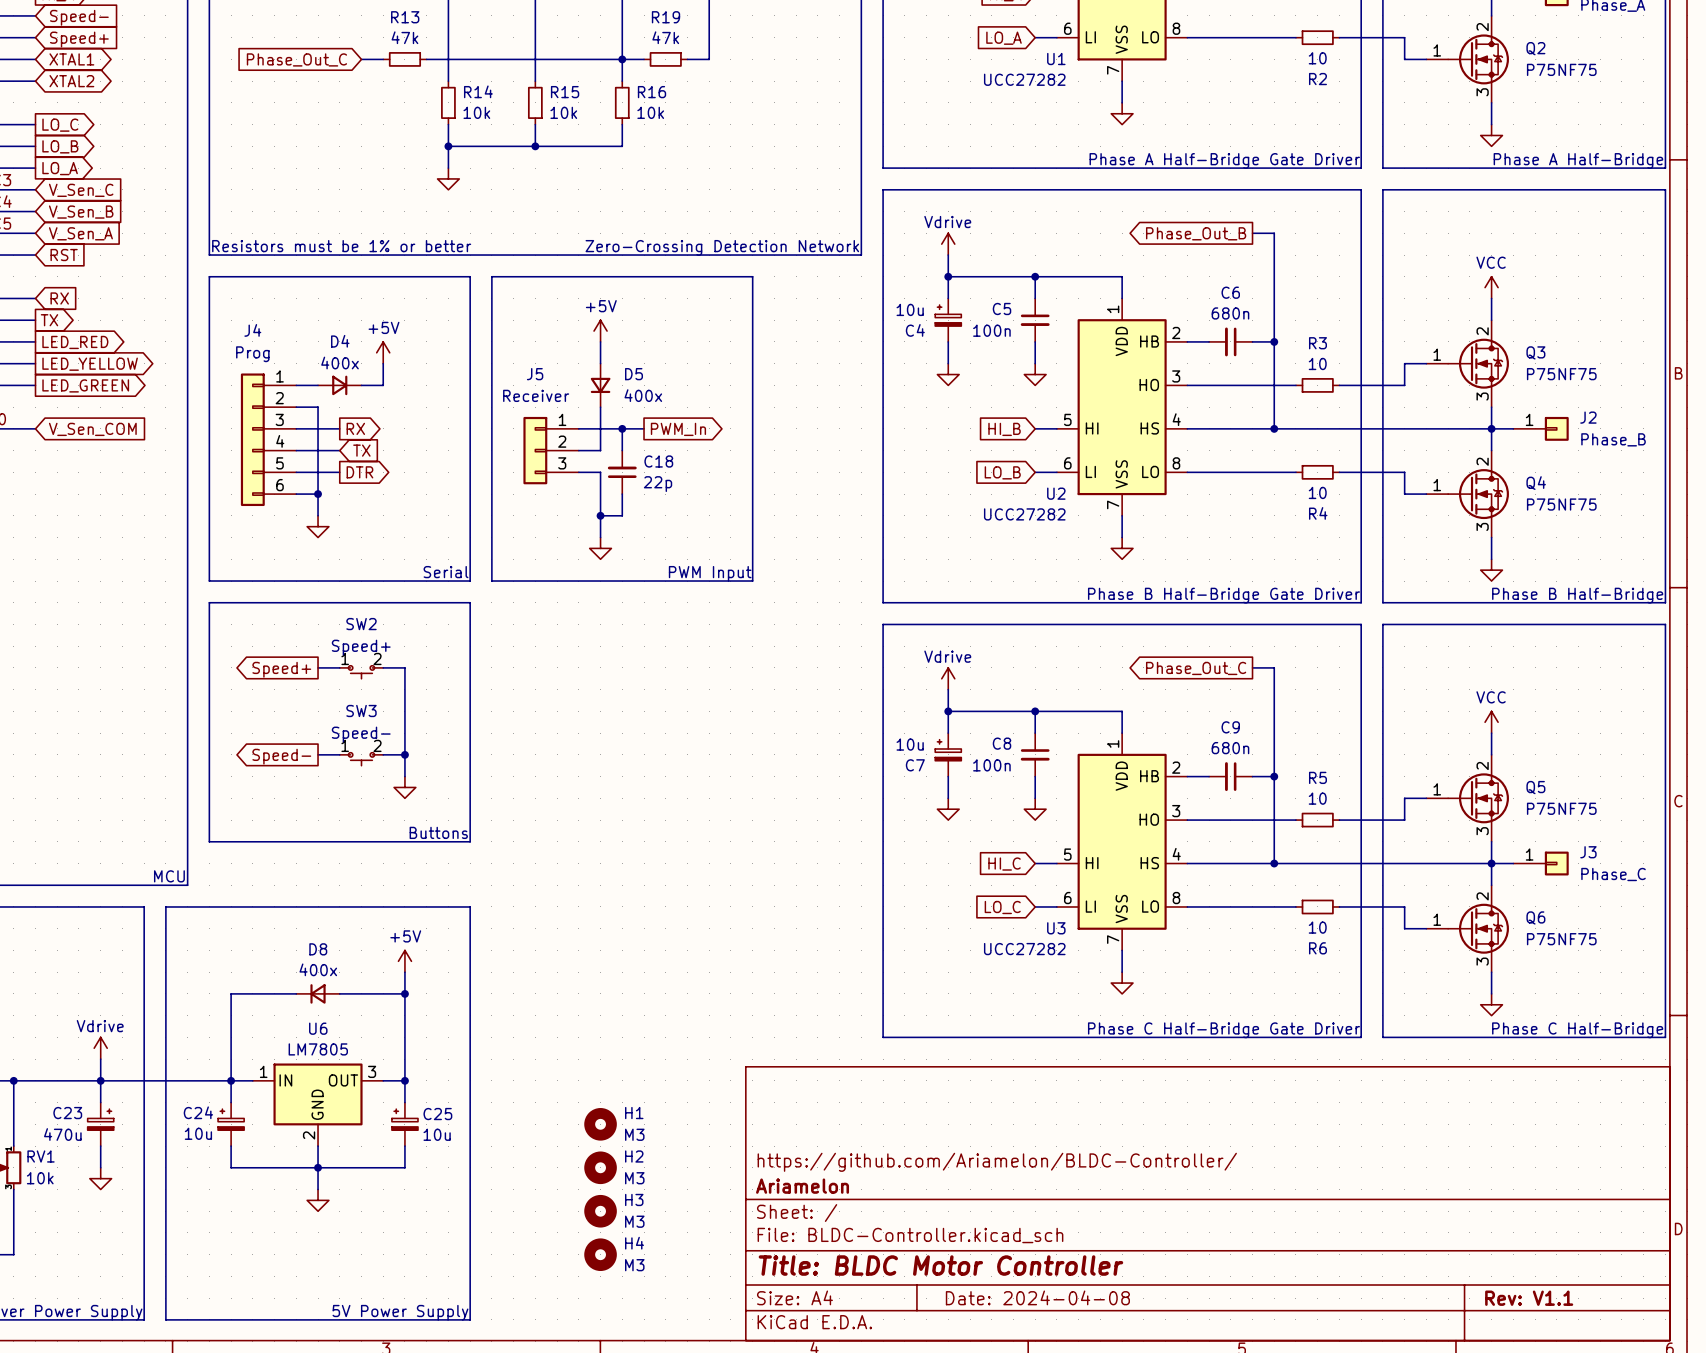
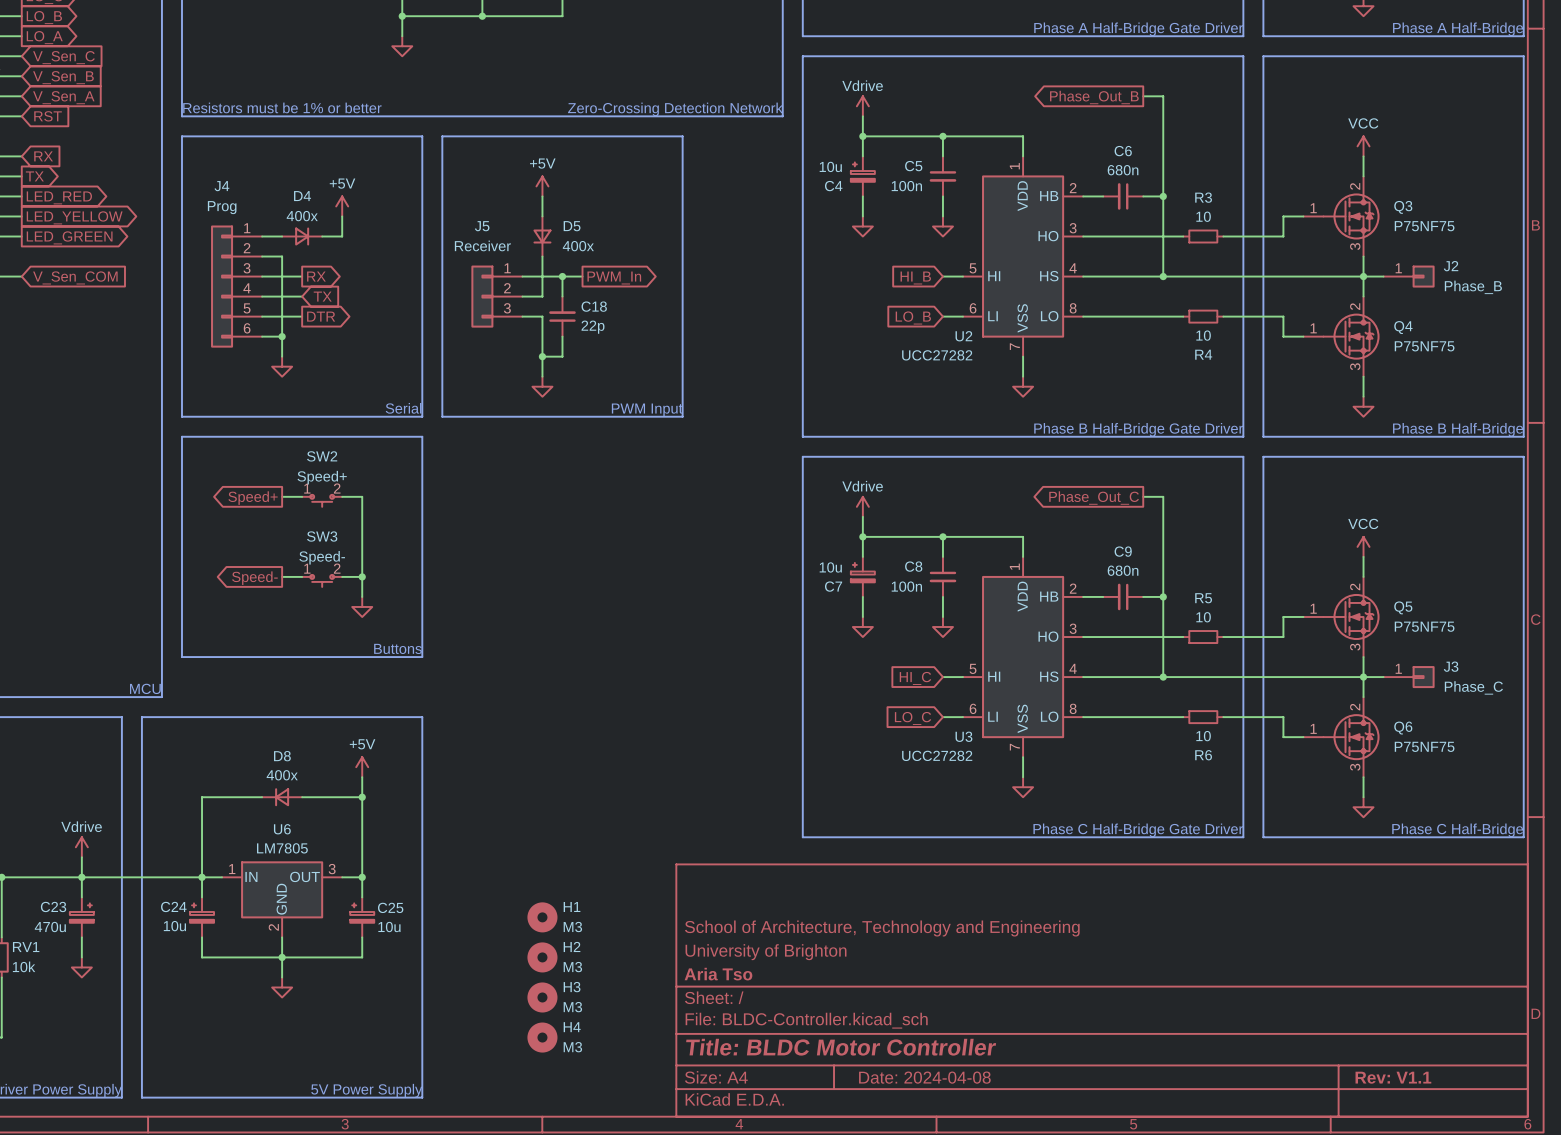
title block: none -> School of Architecture, Technology and Engineering (882, 928)
title block: https://github.com/Ariamelon/BLDC-Controller/ (997, 1162) -> University of Brighton (766, 952)
title block: Ariamelon (802, 1186) -> Aria Tso (718, 974)

